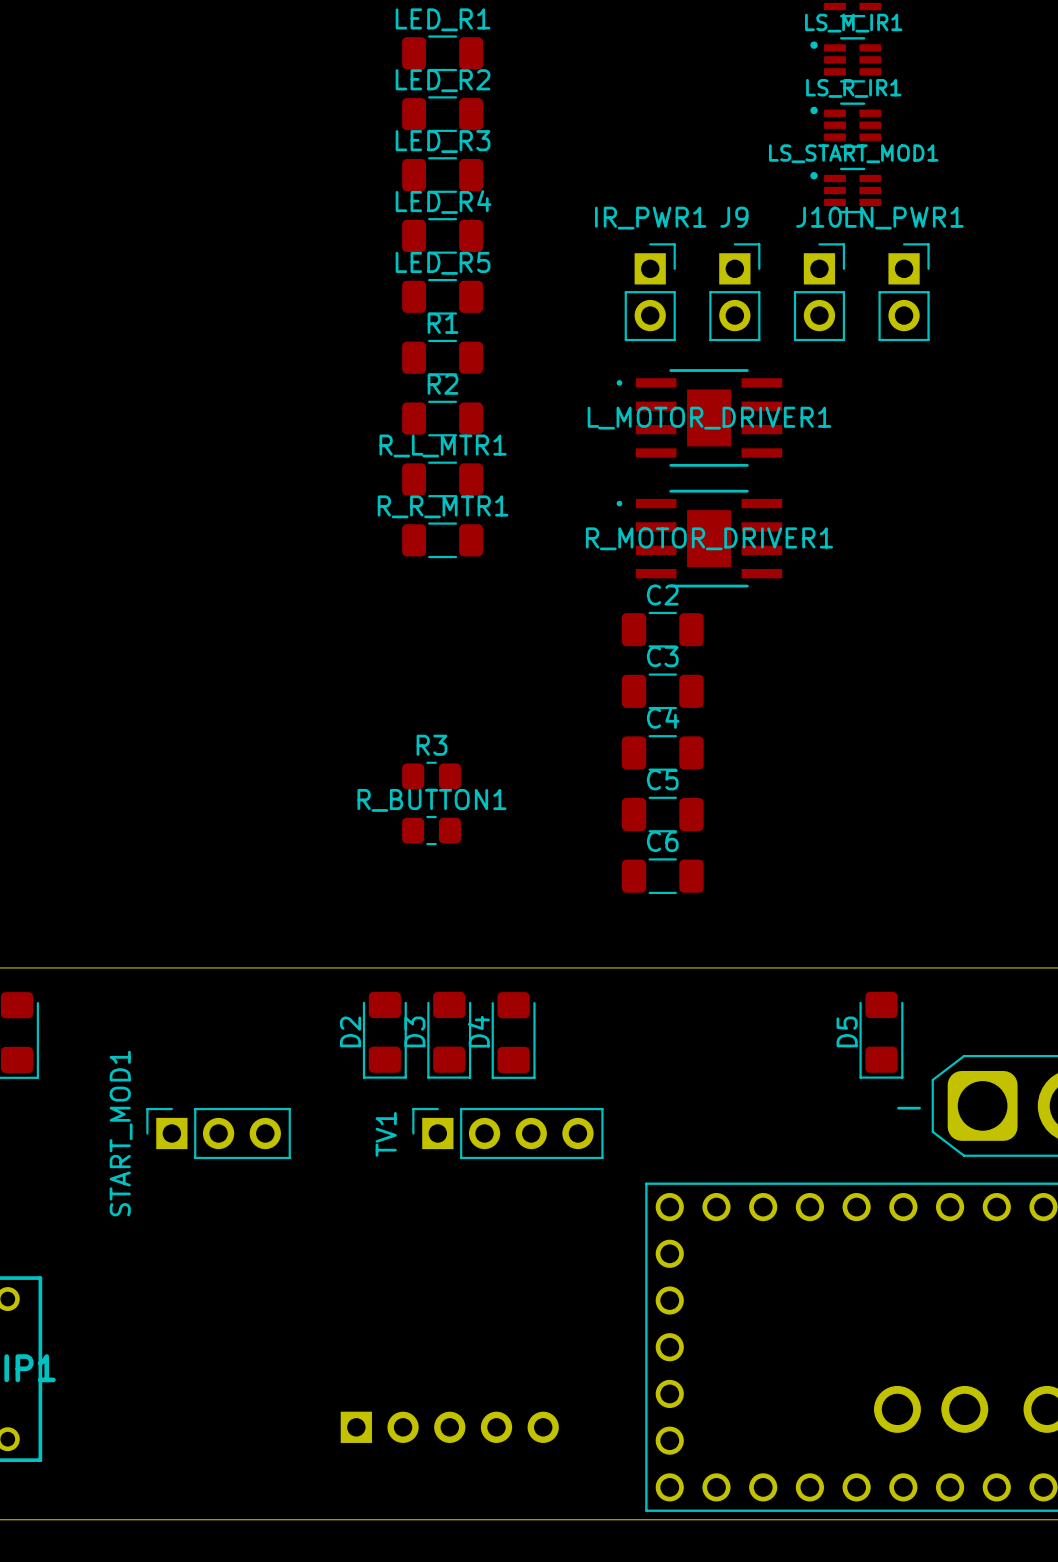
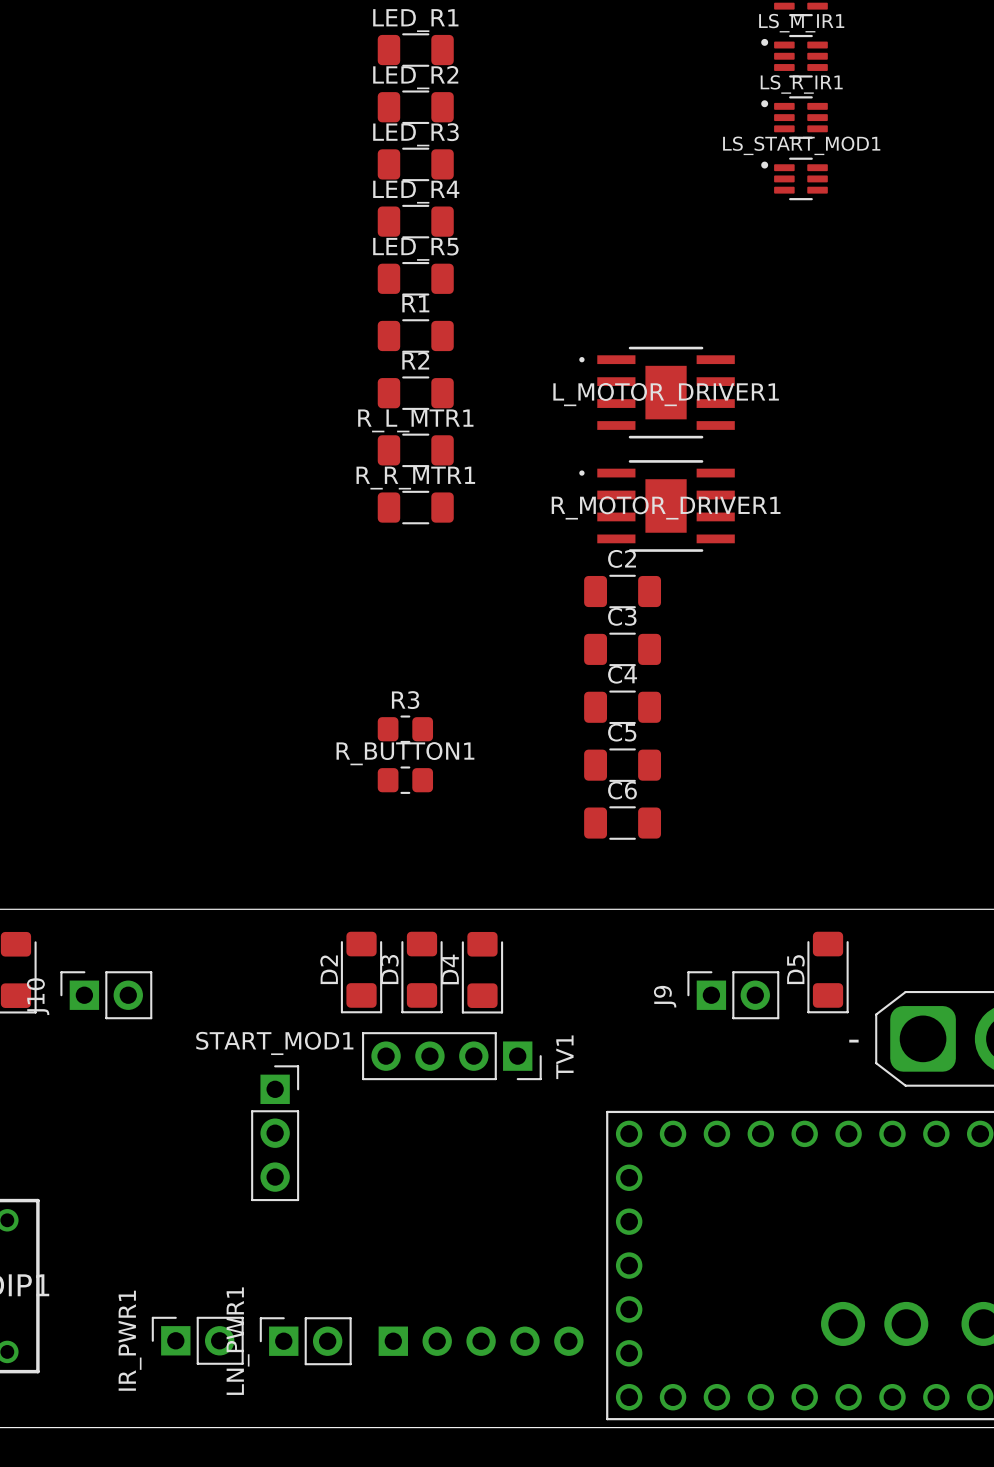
IR_PWR1 rotation: 0° (650, 292) -> 90° counterclockwise (197, 1340)
IR_PWR1 position: (650, 292) -> (197, 1340)
J9 rotation: 0° (734, 292) -> 90° counterclockwise (733, 995)
J9 position: (734, 292) -> (733, 995)
J10 rotation: 0° (819, 292) -> 90° counterclockwise (106, 995)
J10 position: (819, 292) -> (106, 995)
LN_PWR1 rotation: 0° (904, 292) -> 90° counterclockwise (305, 1341)
LN_PWR1 position: (904, 292) -> (305, 1341)
START_MOD1 rotation: 0° (218, 1133) -> 90° clockwise (275, 1133)
START_MOD1 position: (218, 1133) -> (275, 1133)
TV1 rotation: 0° (507, 1133) -> 180° (451, 1056)
part position: (449, 1427) -> (481, 1341)

